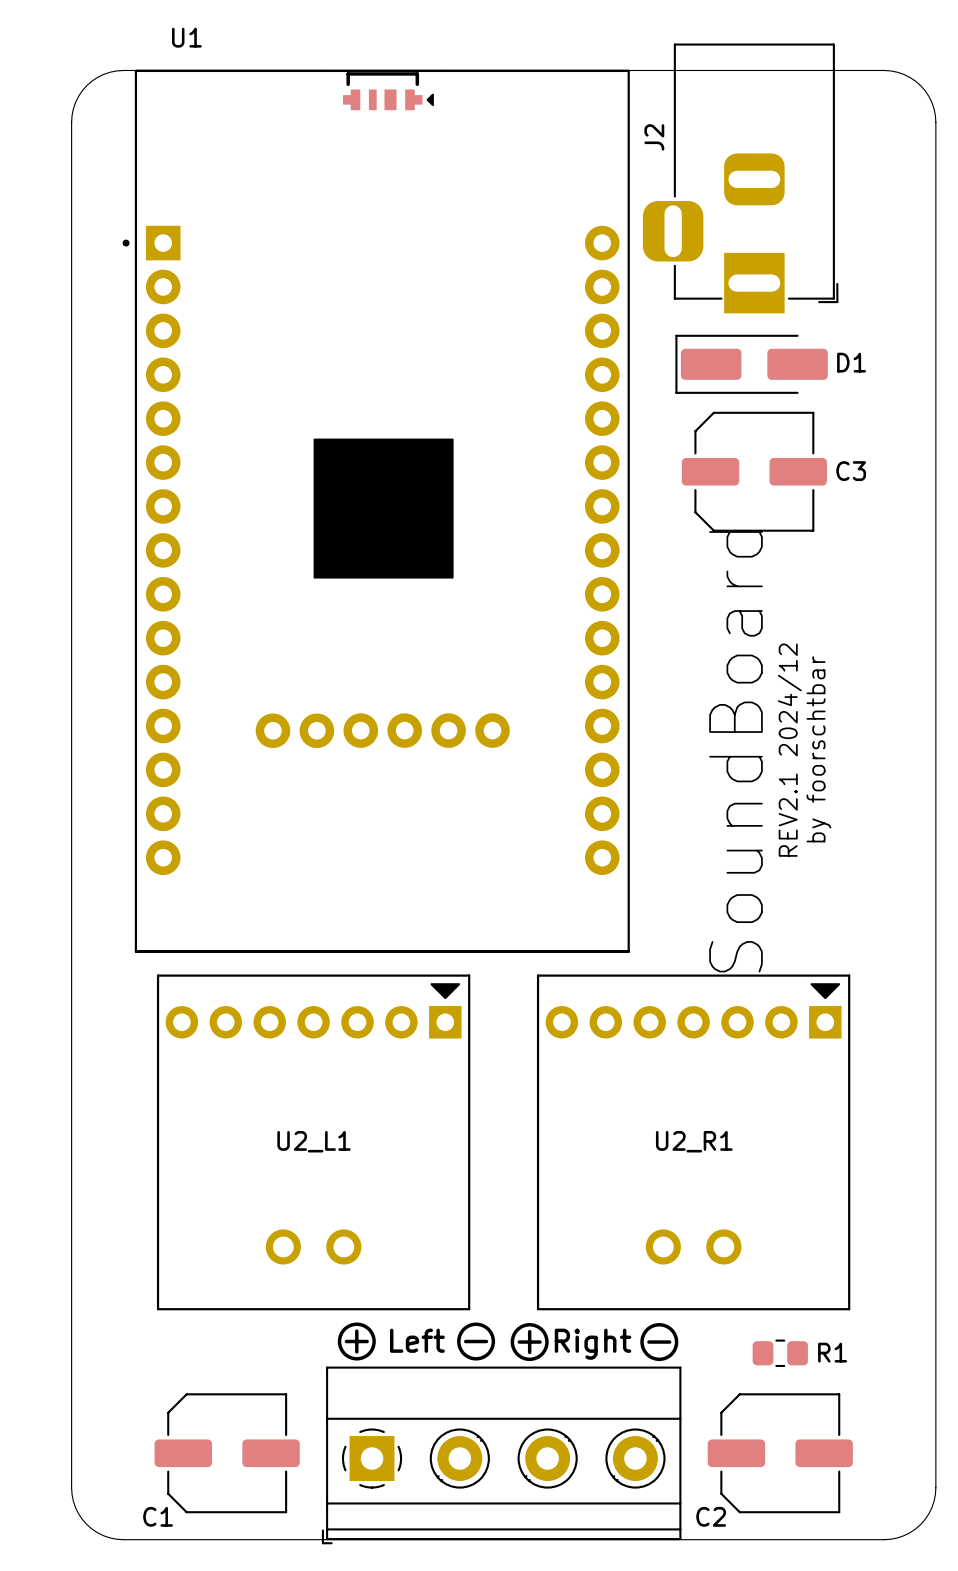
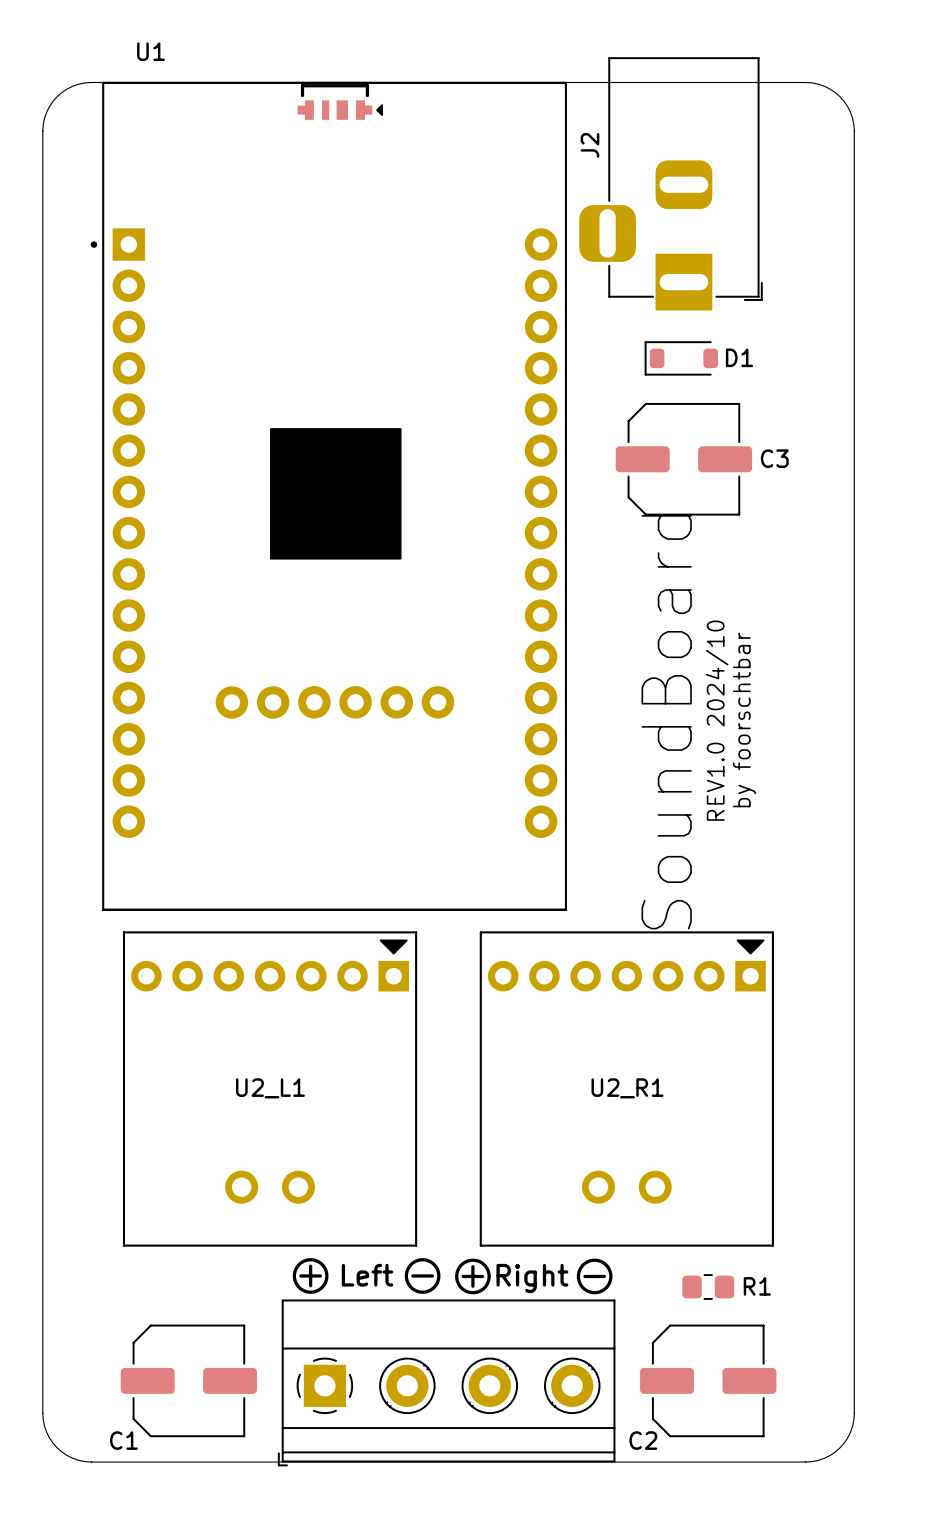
D1 footprint: [675, 334, 828, 394] -> [644, 341, 718, 376]
D1 name position: D1 (851, 362) -> D1 (739, 357)
text: REV2.1 2024/12 (789, 750) -> REV1.0 2024/10 (717, 720)

